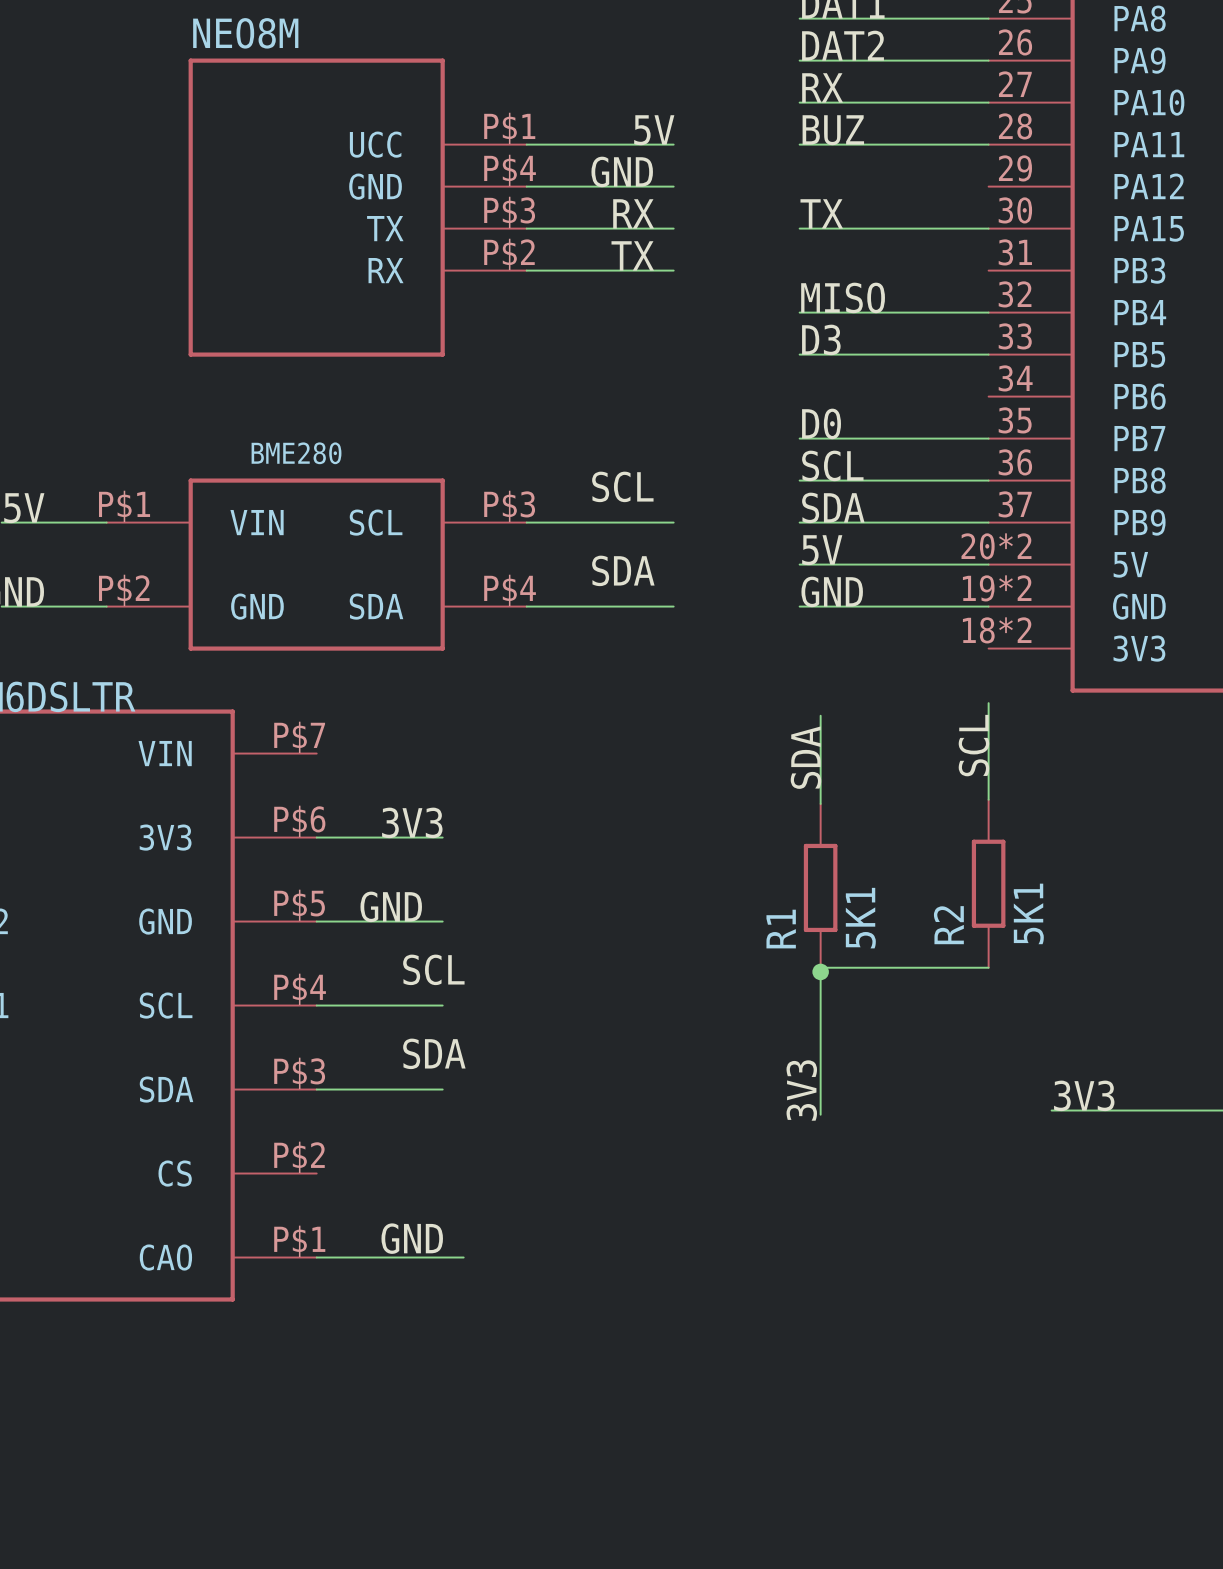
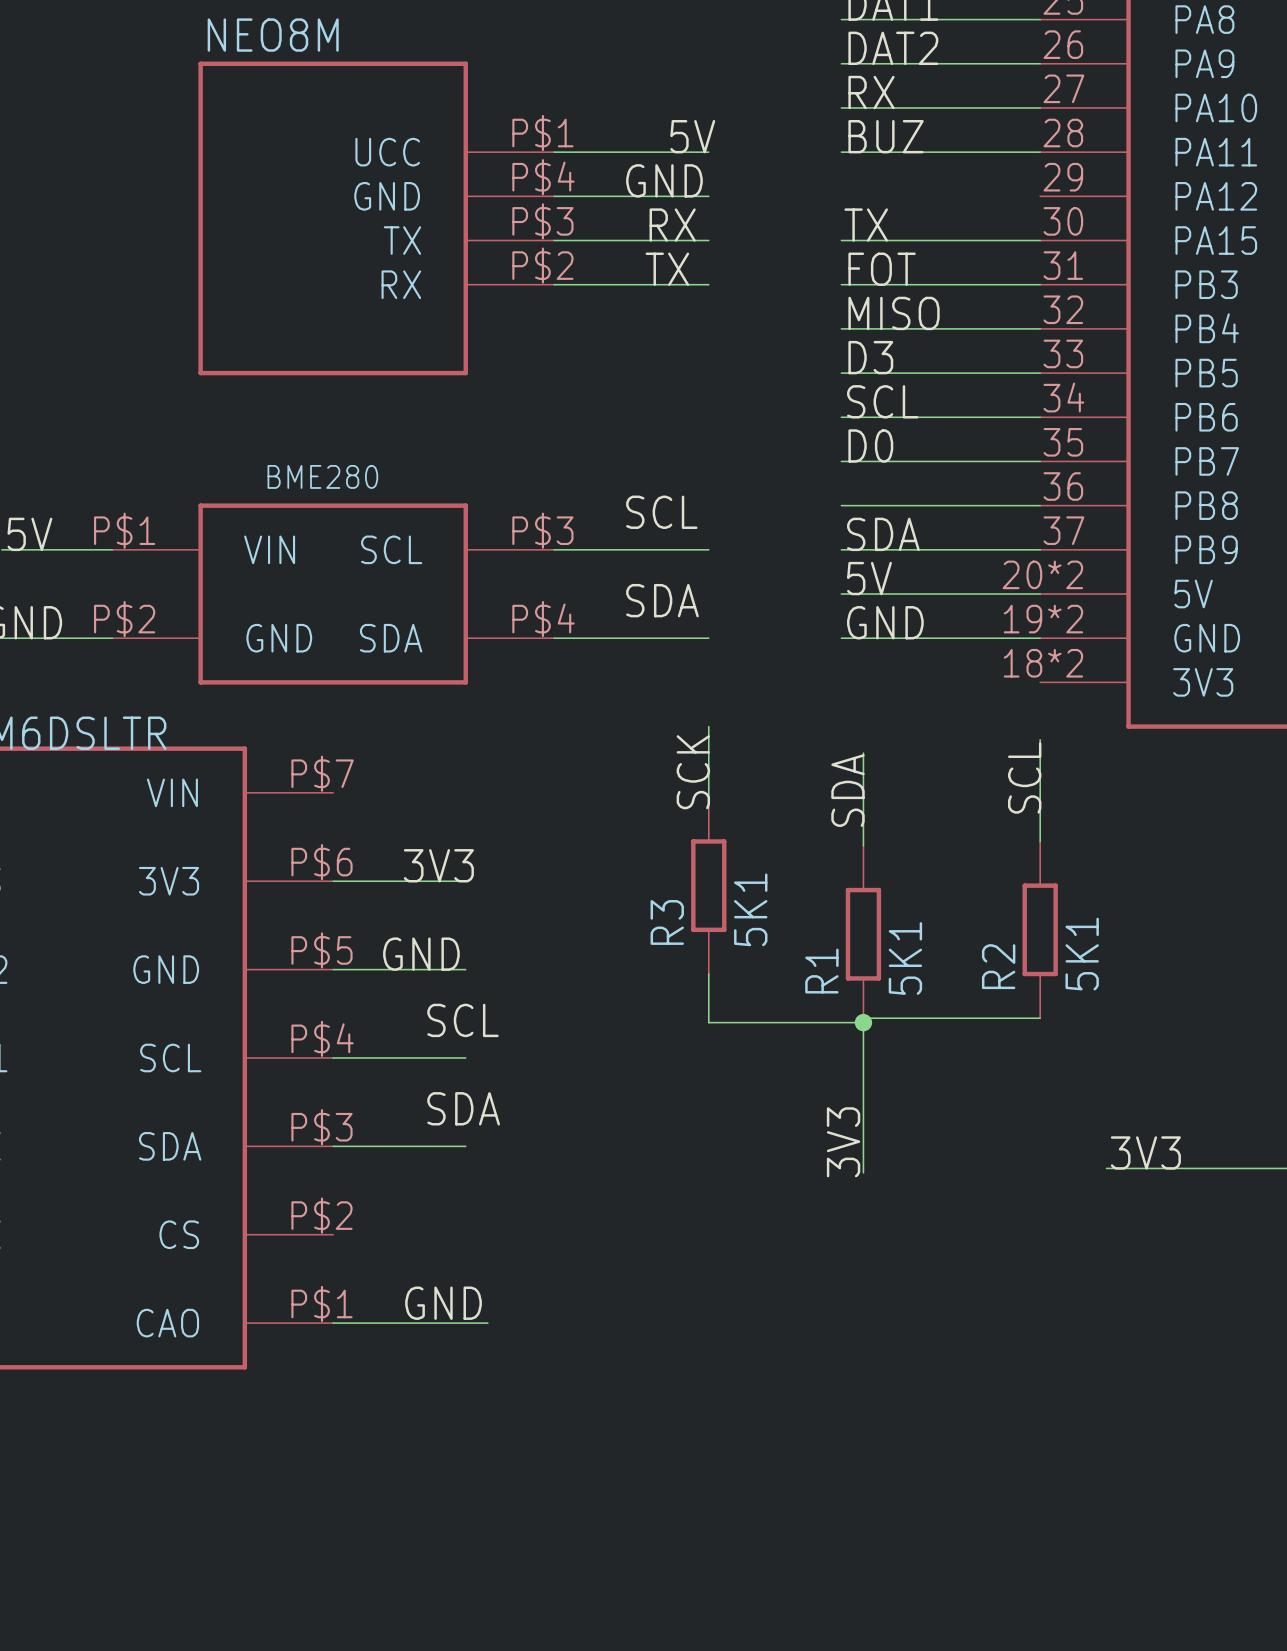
label: none -> FOT (882, 269)
wire: none -> (841, 284) (1040, 284)
wire: none -> (841, 417) (1040, 417)
label position: SCL (832, 465) -> SCL (882, 401)
wire: none -> (708, 726) (708, 797)
label: none -> SCK (693, 772)
R3: none -> 5K1 (708, 885)
wire: none -> (708, 974) (708, 1022) (863, 1022)

